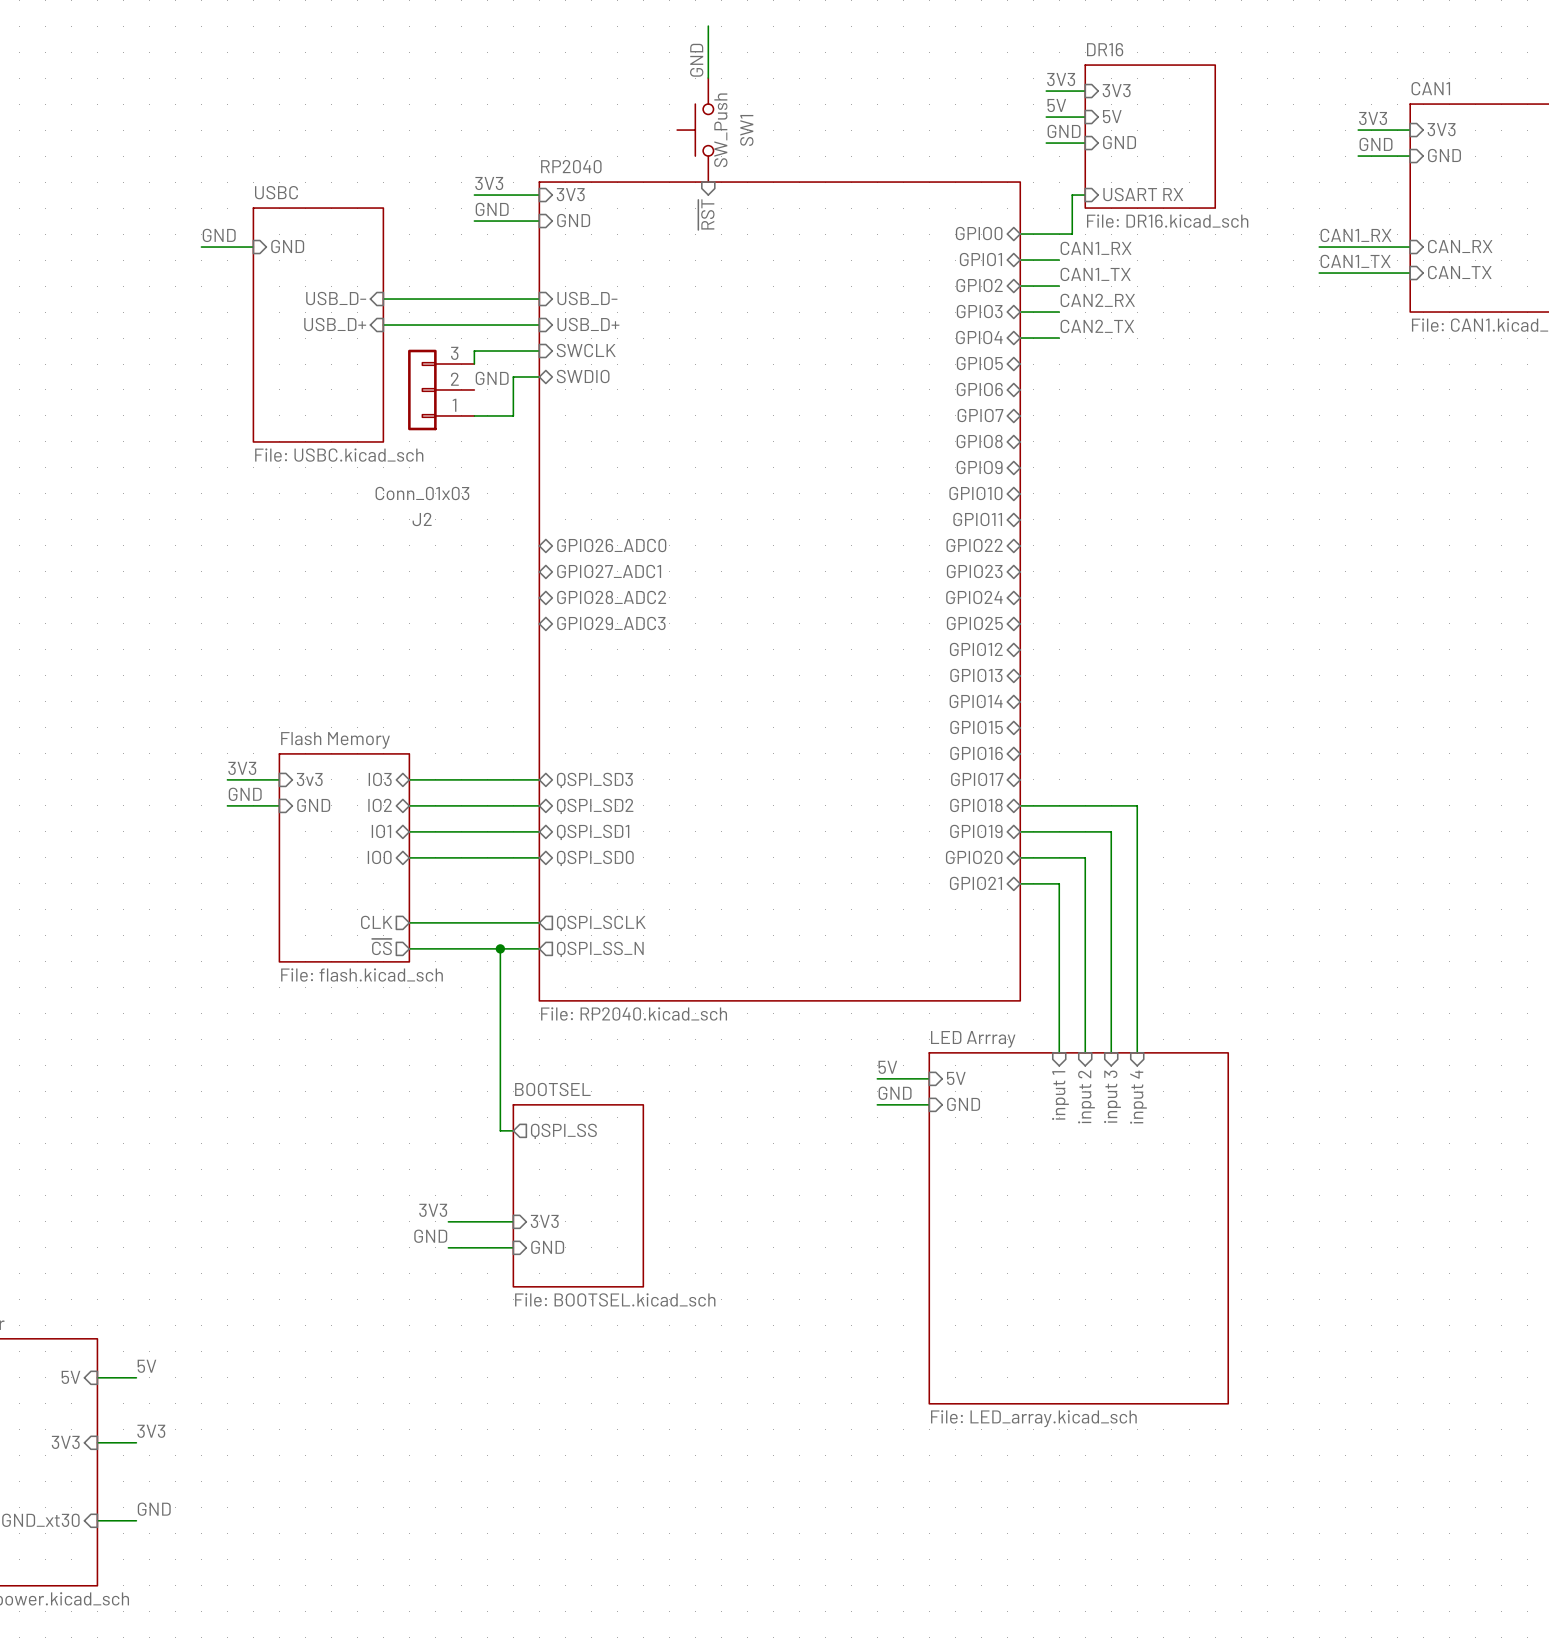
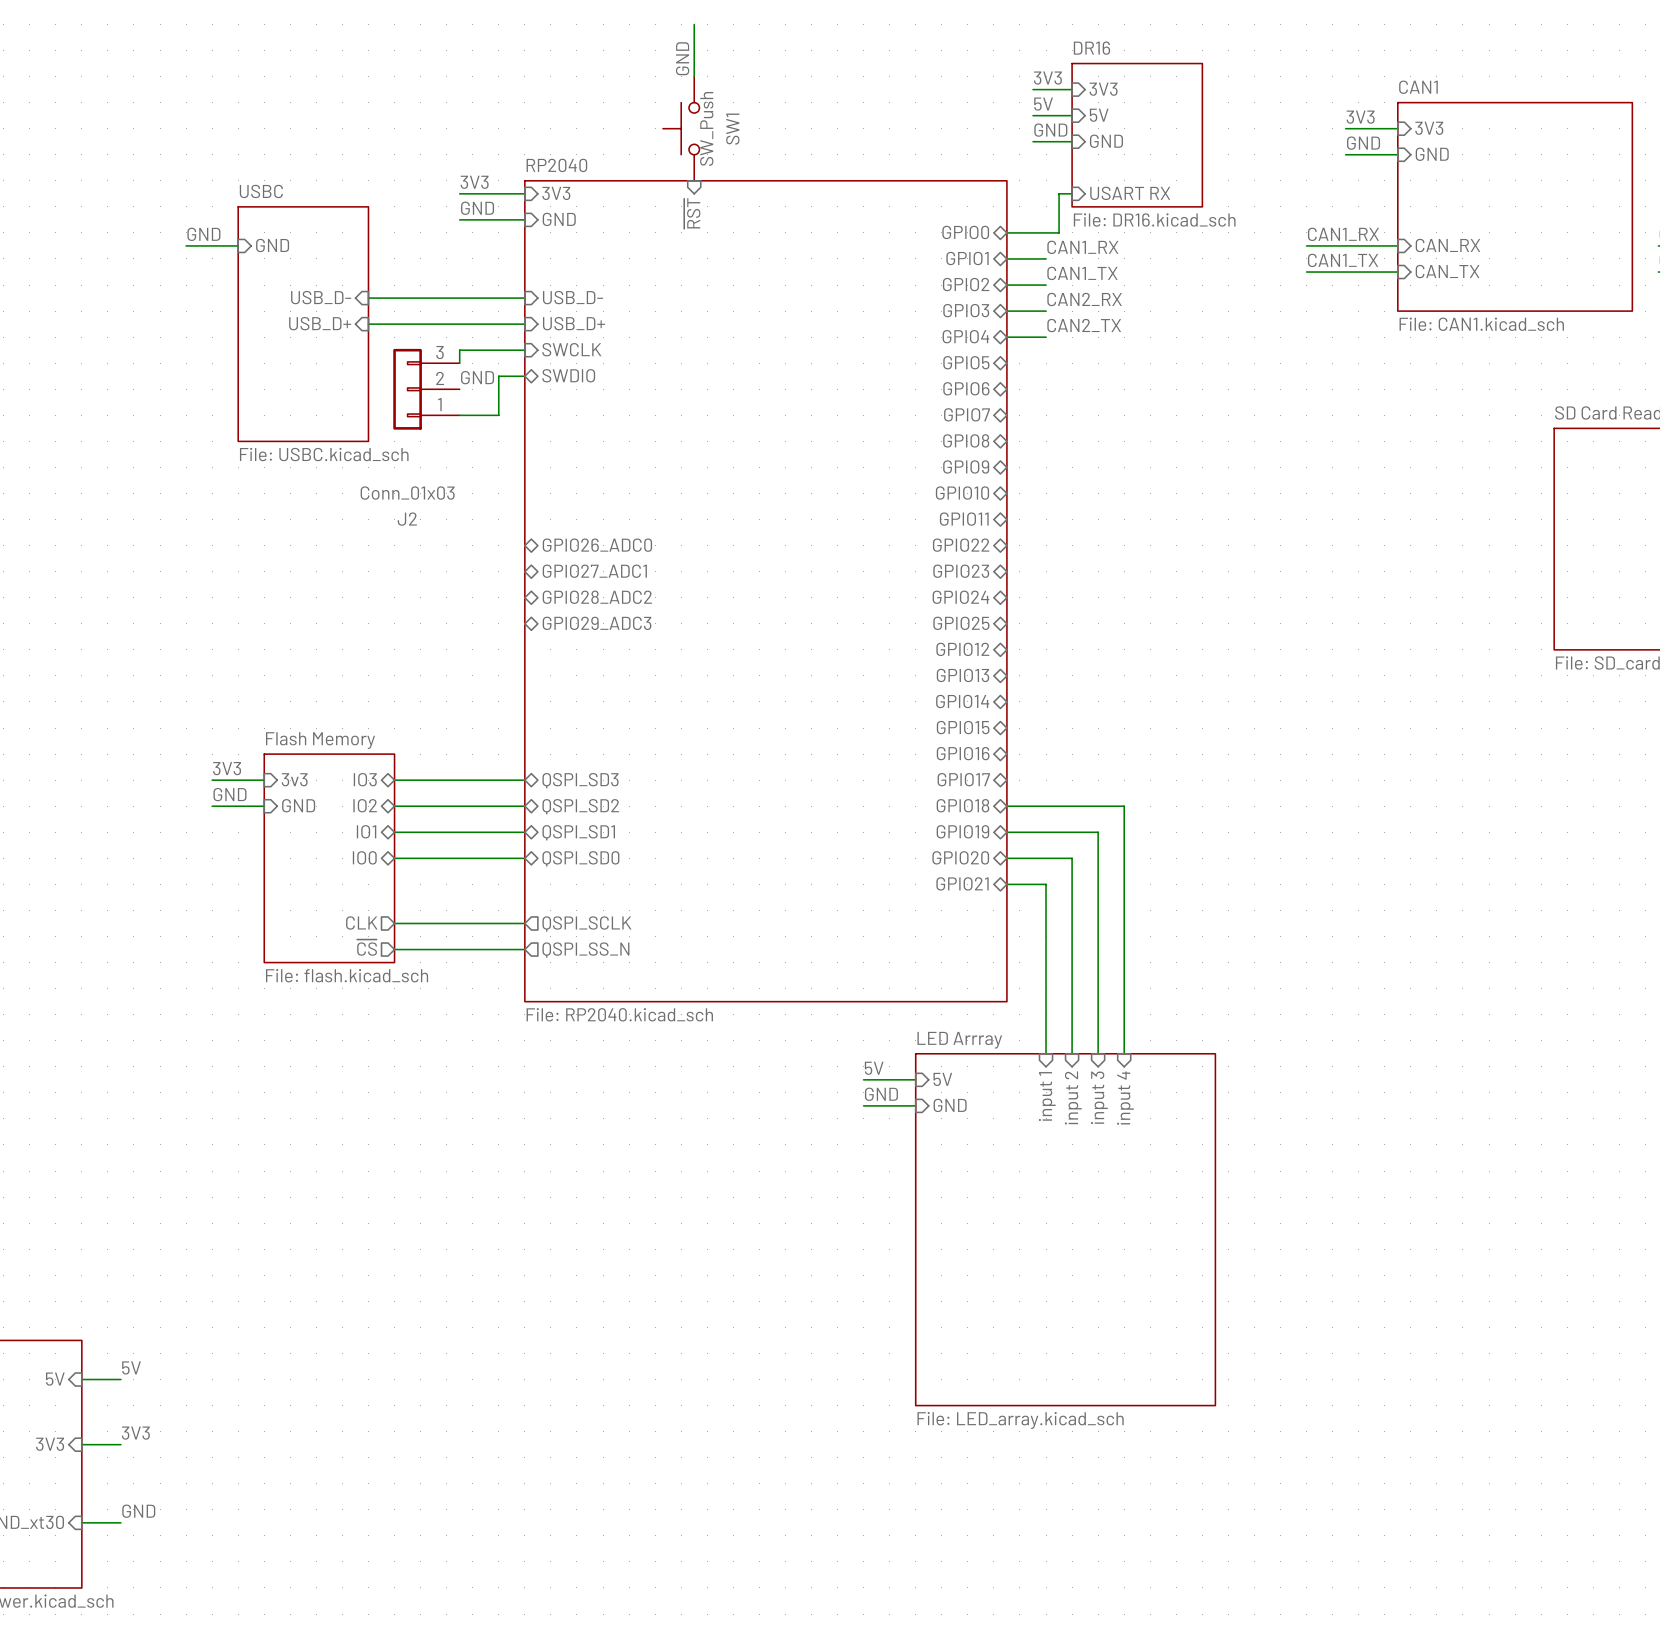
wire: (500, 948) (500, 1130) (513, 1130) -> none
junction: (500, 948) -> none
sheet pin: QSPI_SS (563, 1131) -> none
sheet BOOTSEL: File: BOOTSEL.kicad_sch (578, 1195) -> none
label: 3V3 (433, 1210) -> none
wire: (448, 1221) (513, 1221) -> none
sheet pin: 3V3 (544, 1221) -> none
label: GND (430, 1236) -> none
wire: (448, 1247) (513, 1247) -> none
sheet pin: GND (547, 1247) -> none

